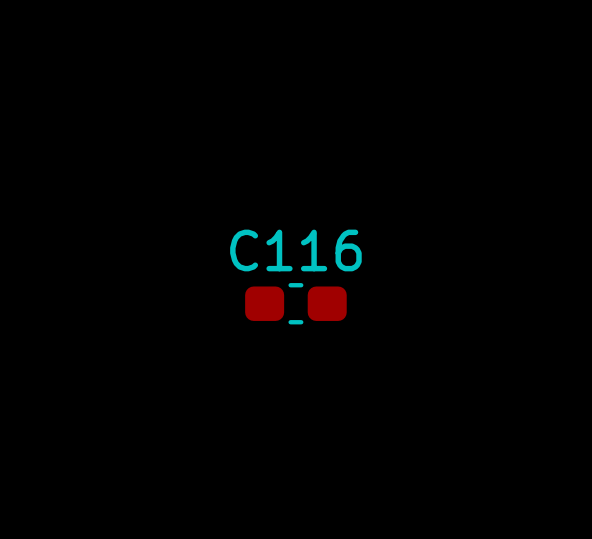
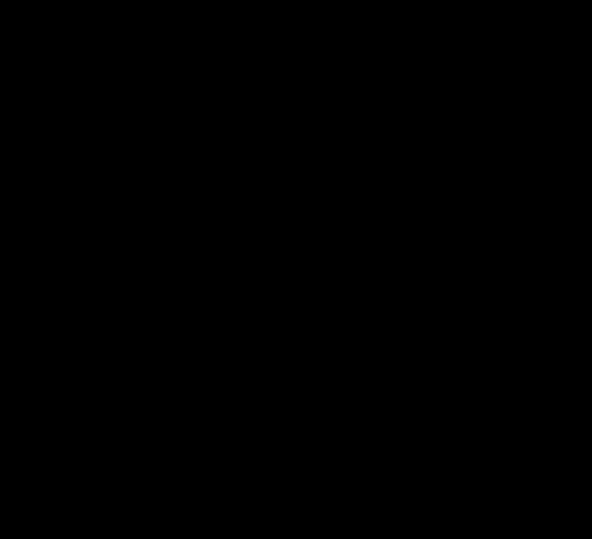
C116: (295, 303) -> none

